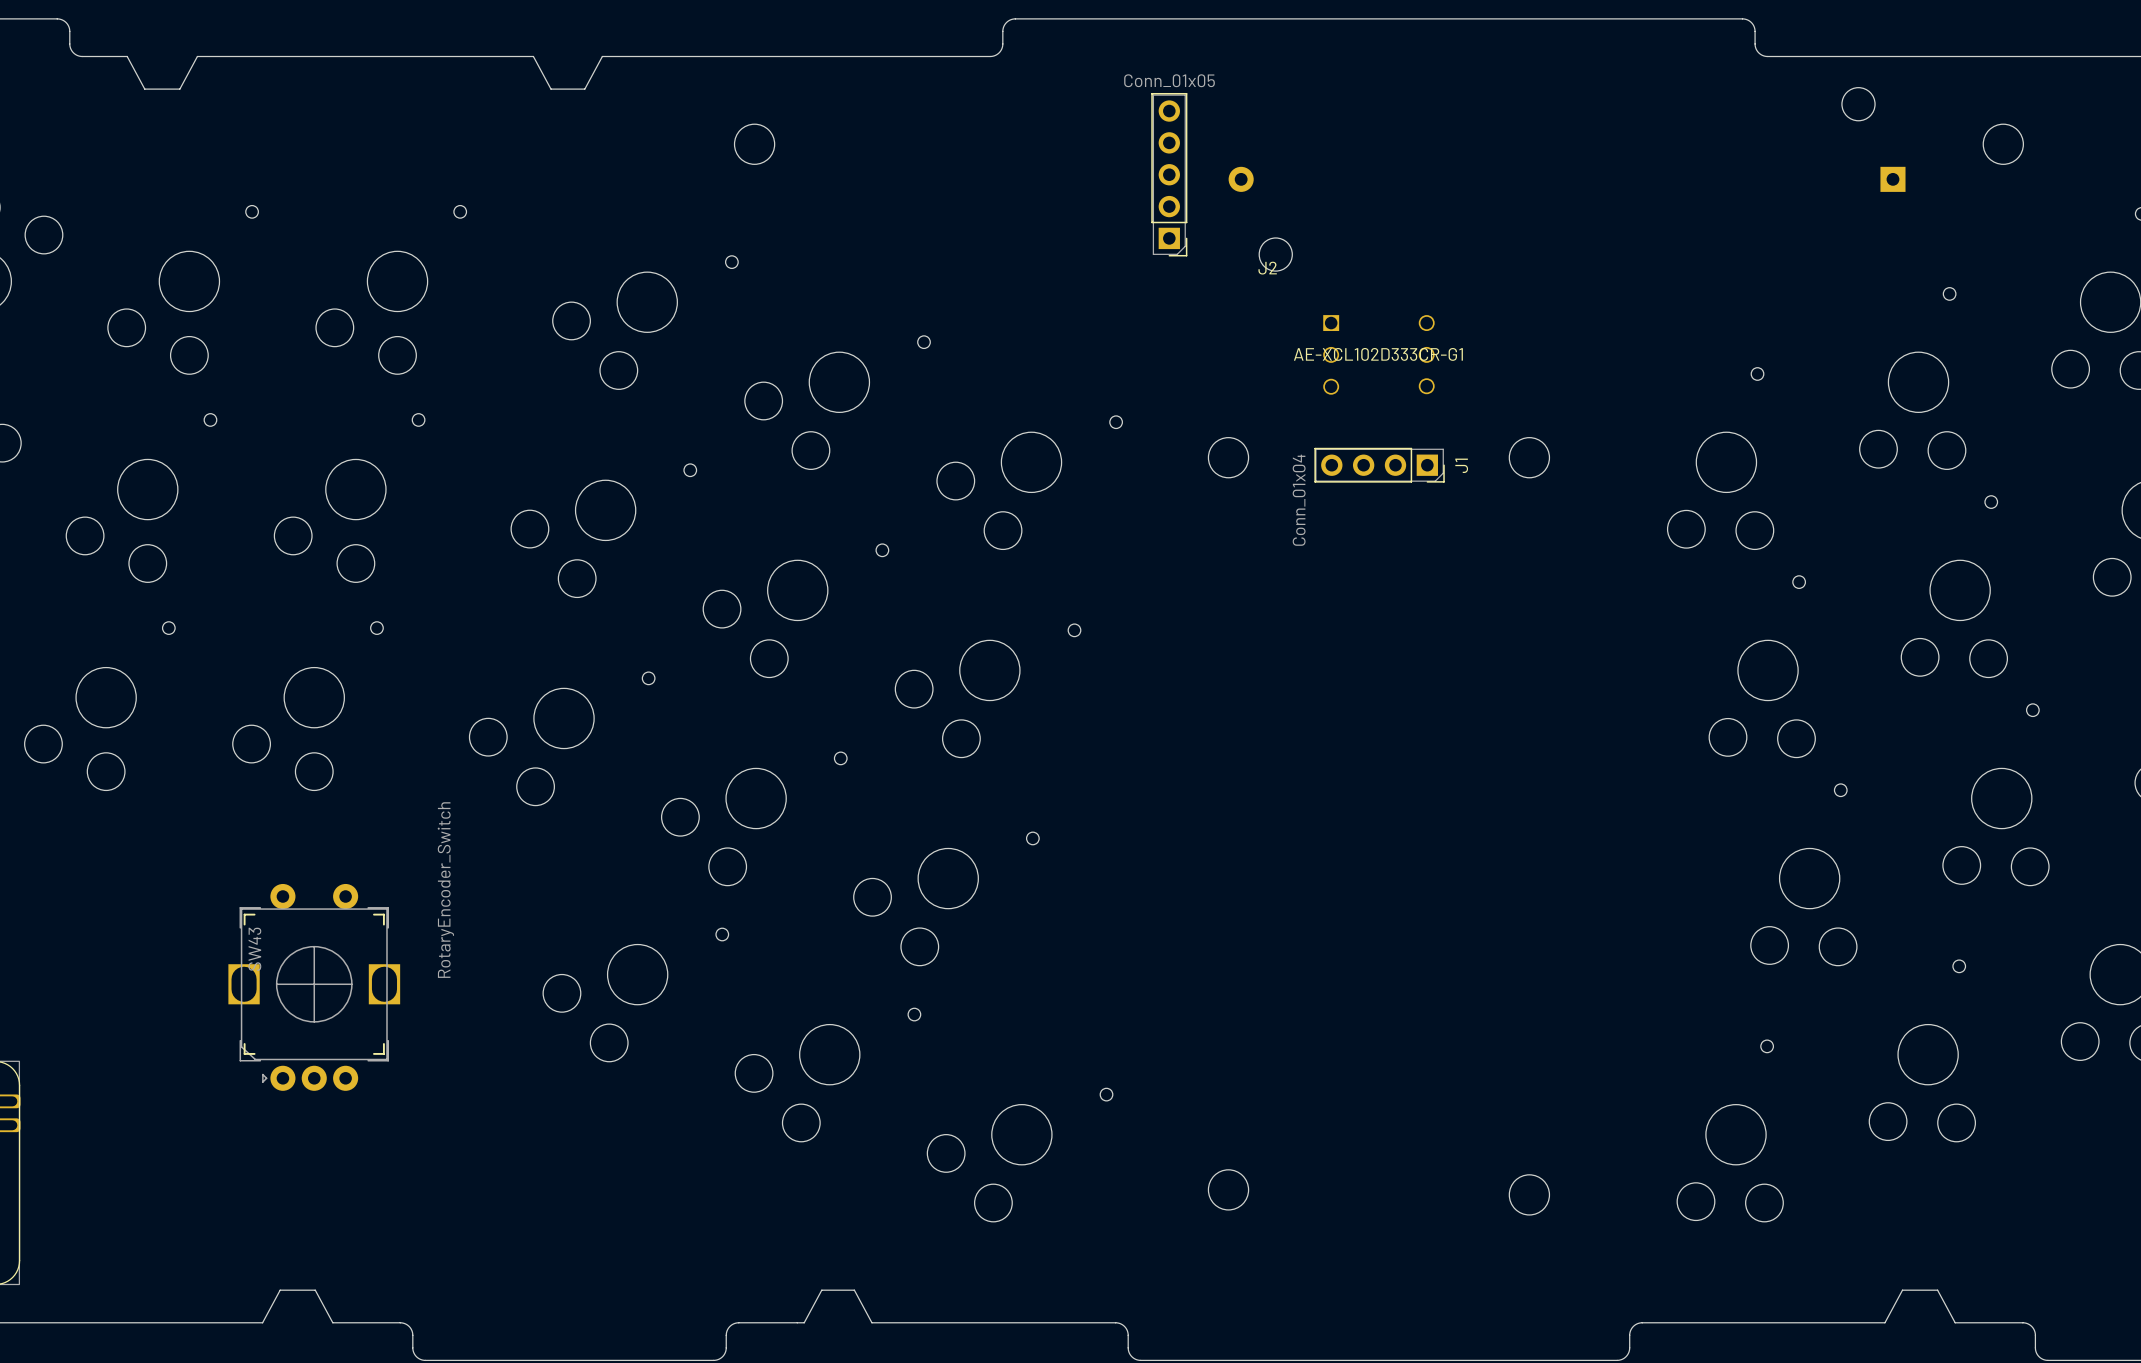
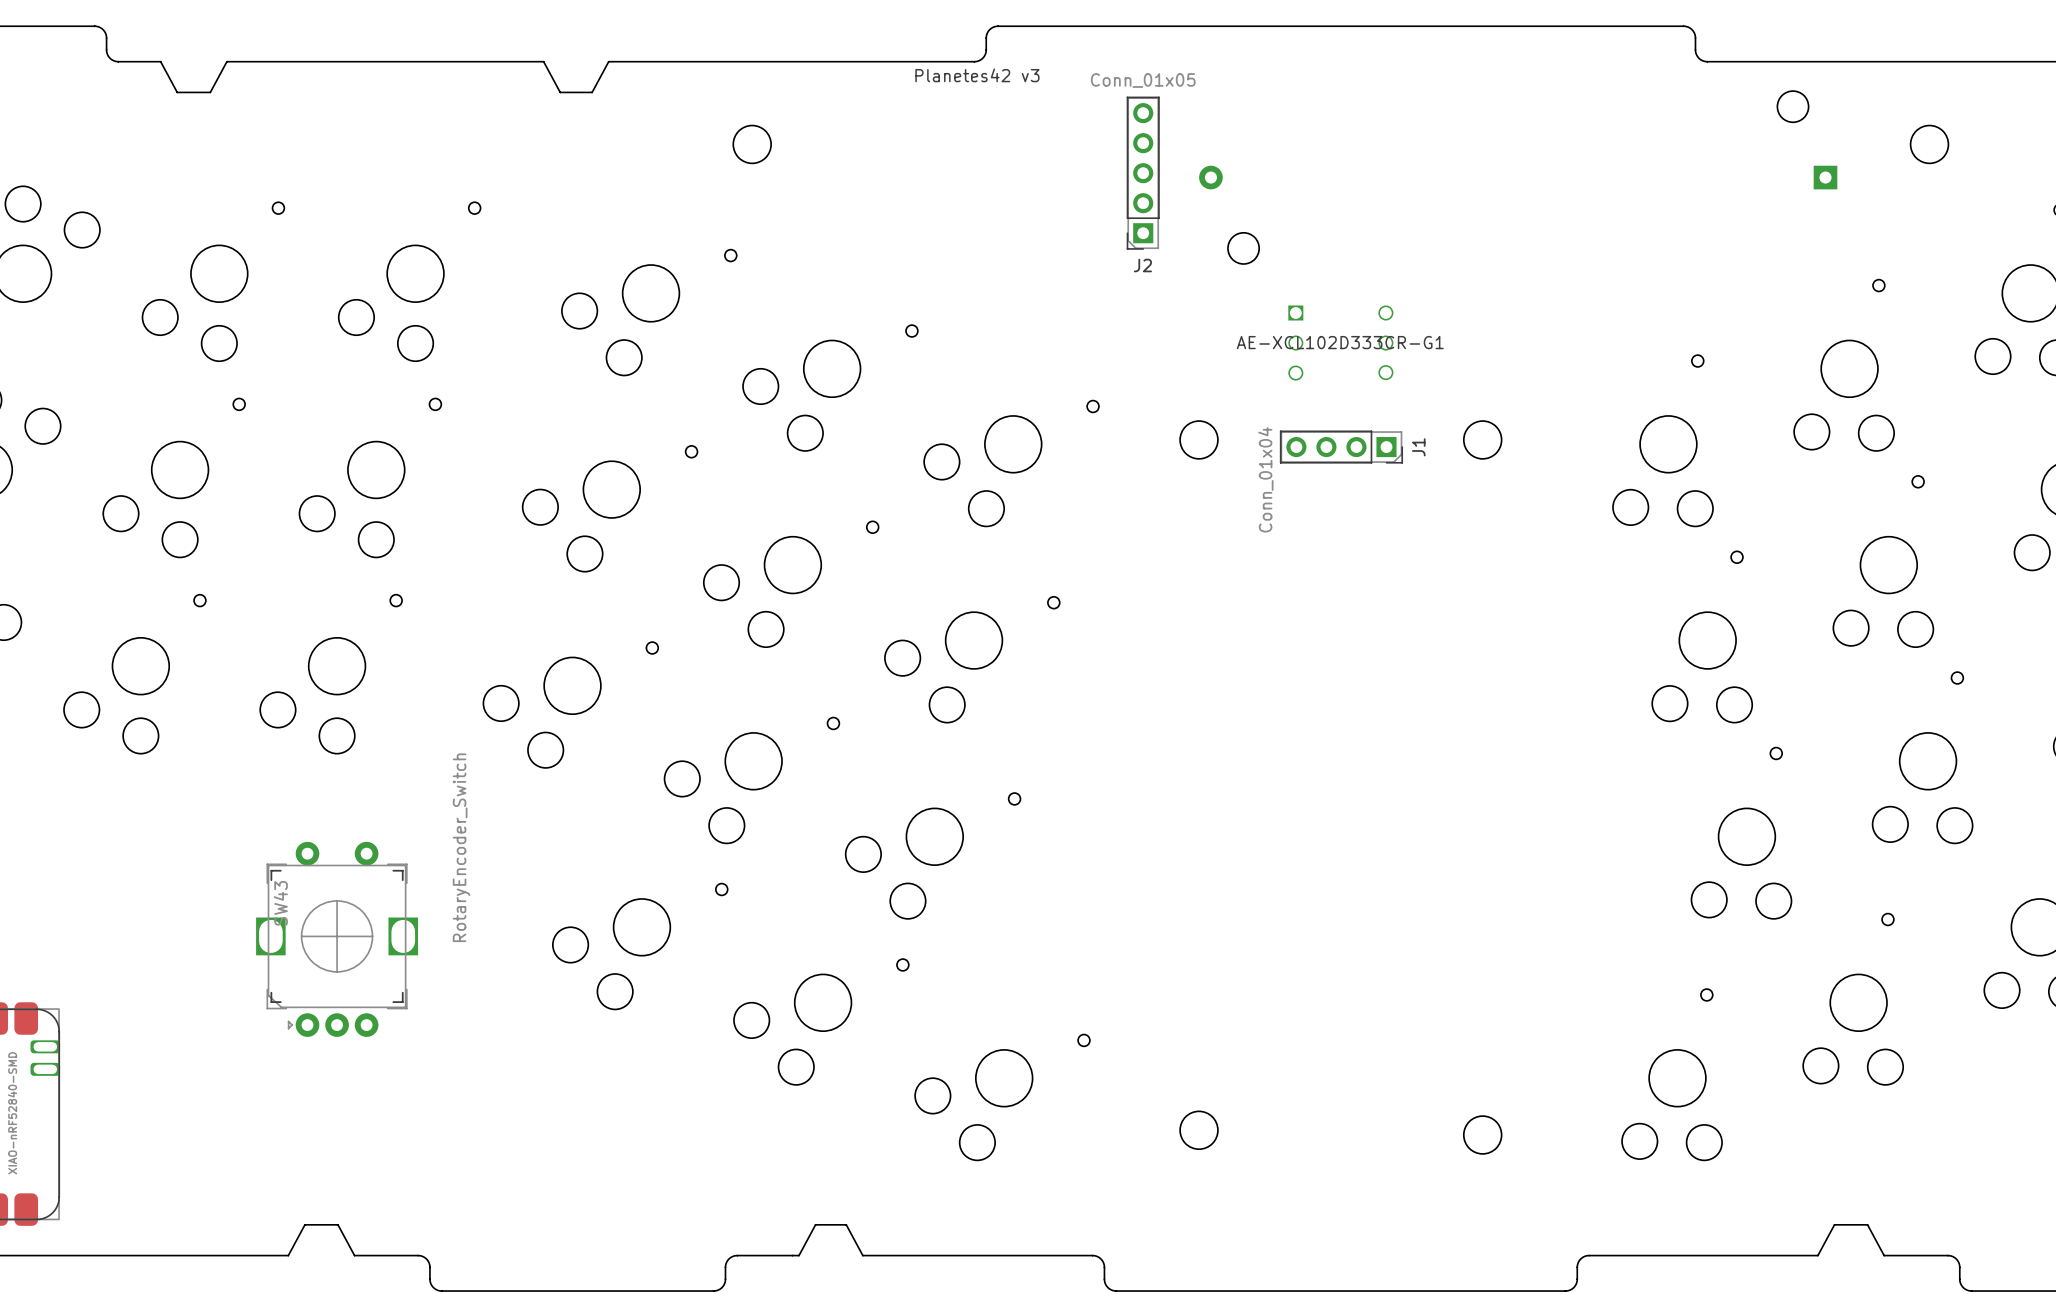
text: none -> Planetes42 v3 (977, 75)
J2 footprint: [1151, 92, 1188, 257] -> [1126, 96, 1160, 250]
J2 name position: J2 (1267, 268) -> J2 (1142, 265)

